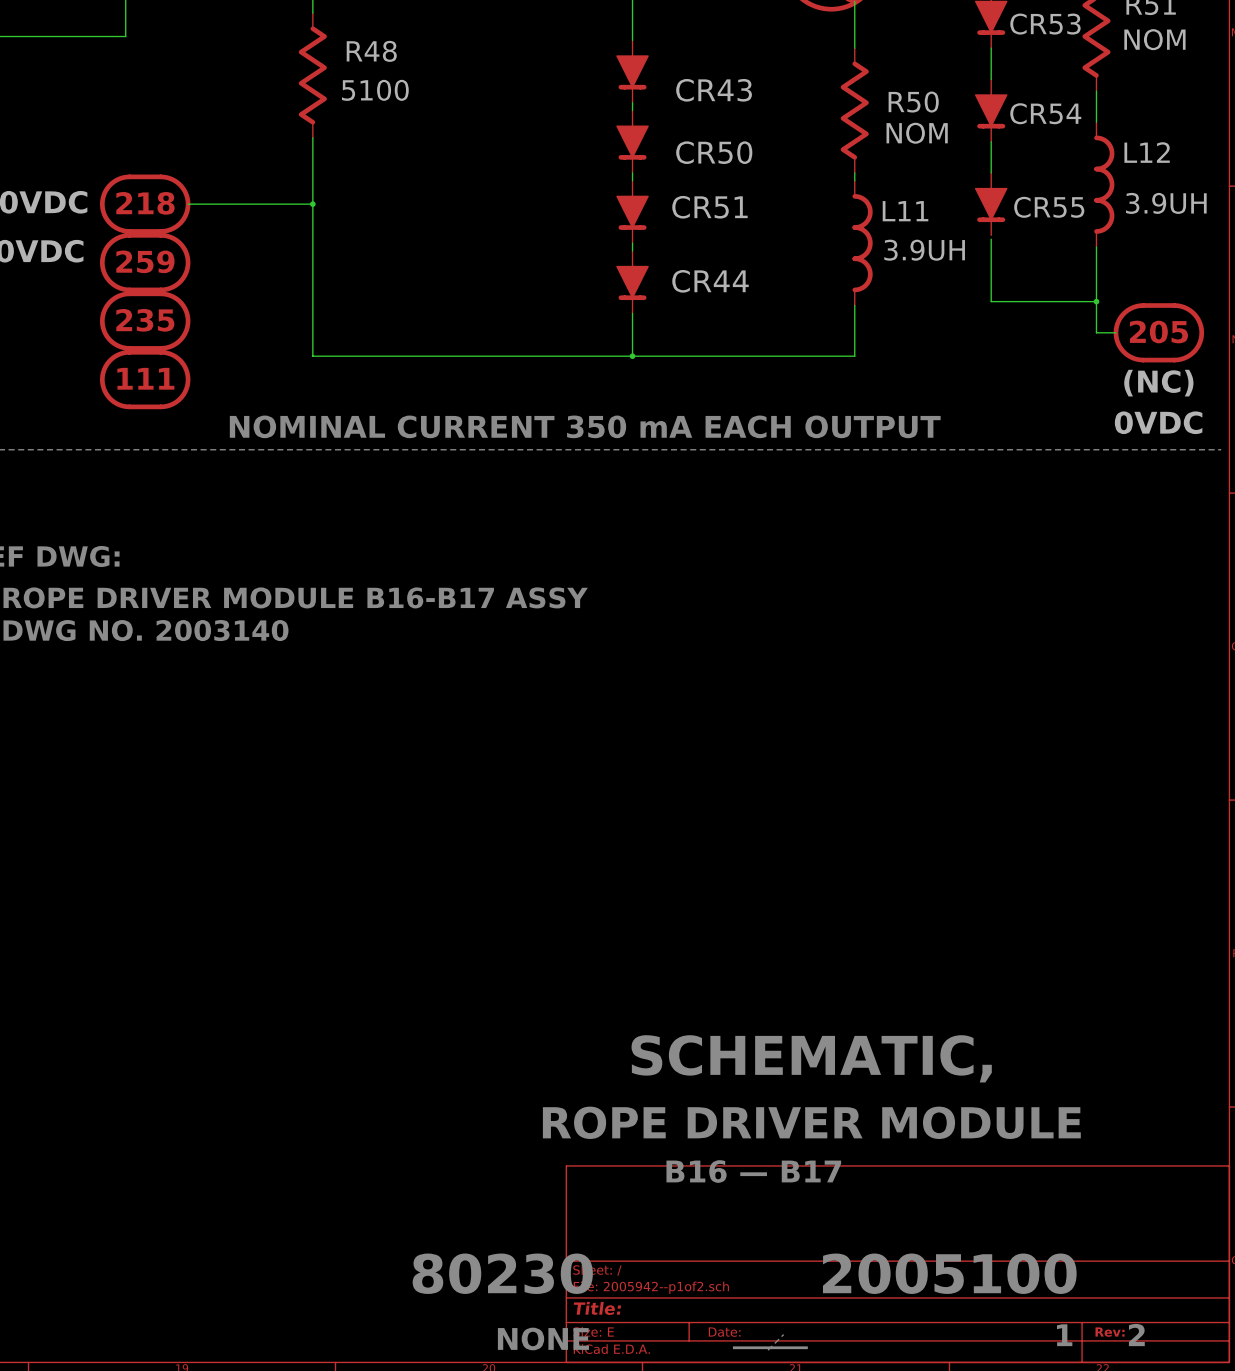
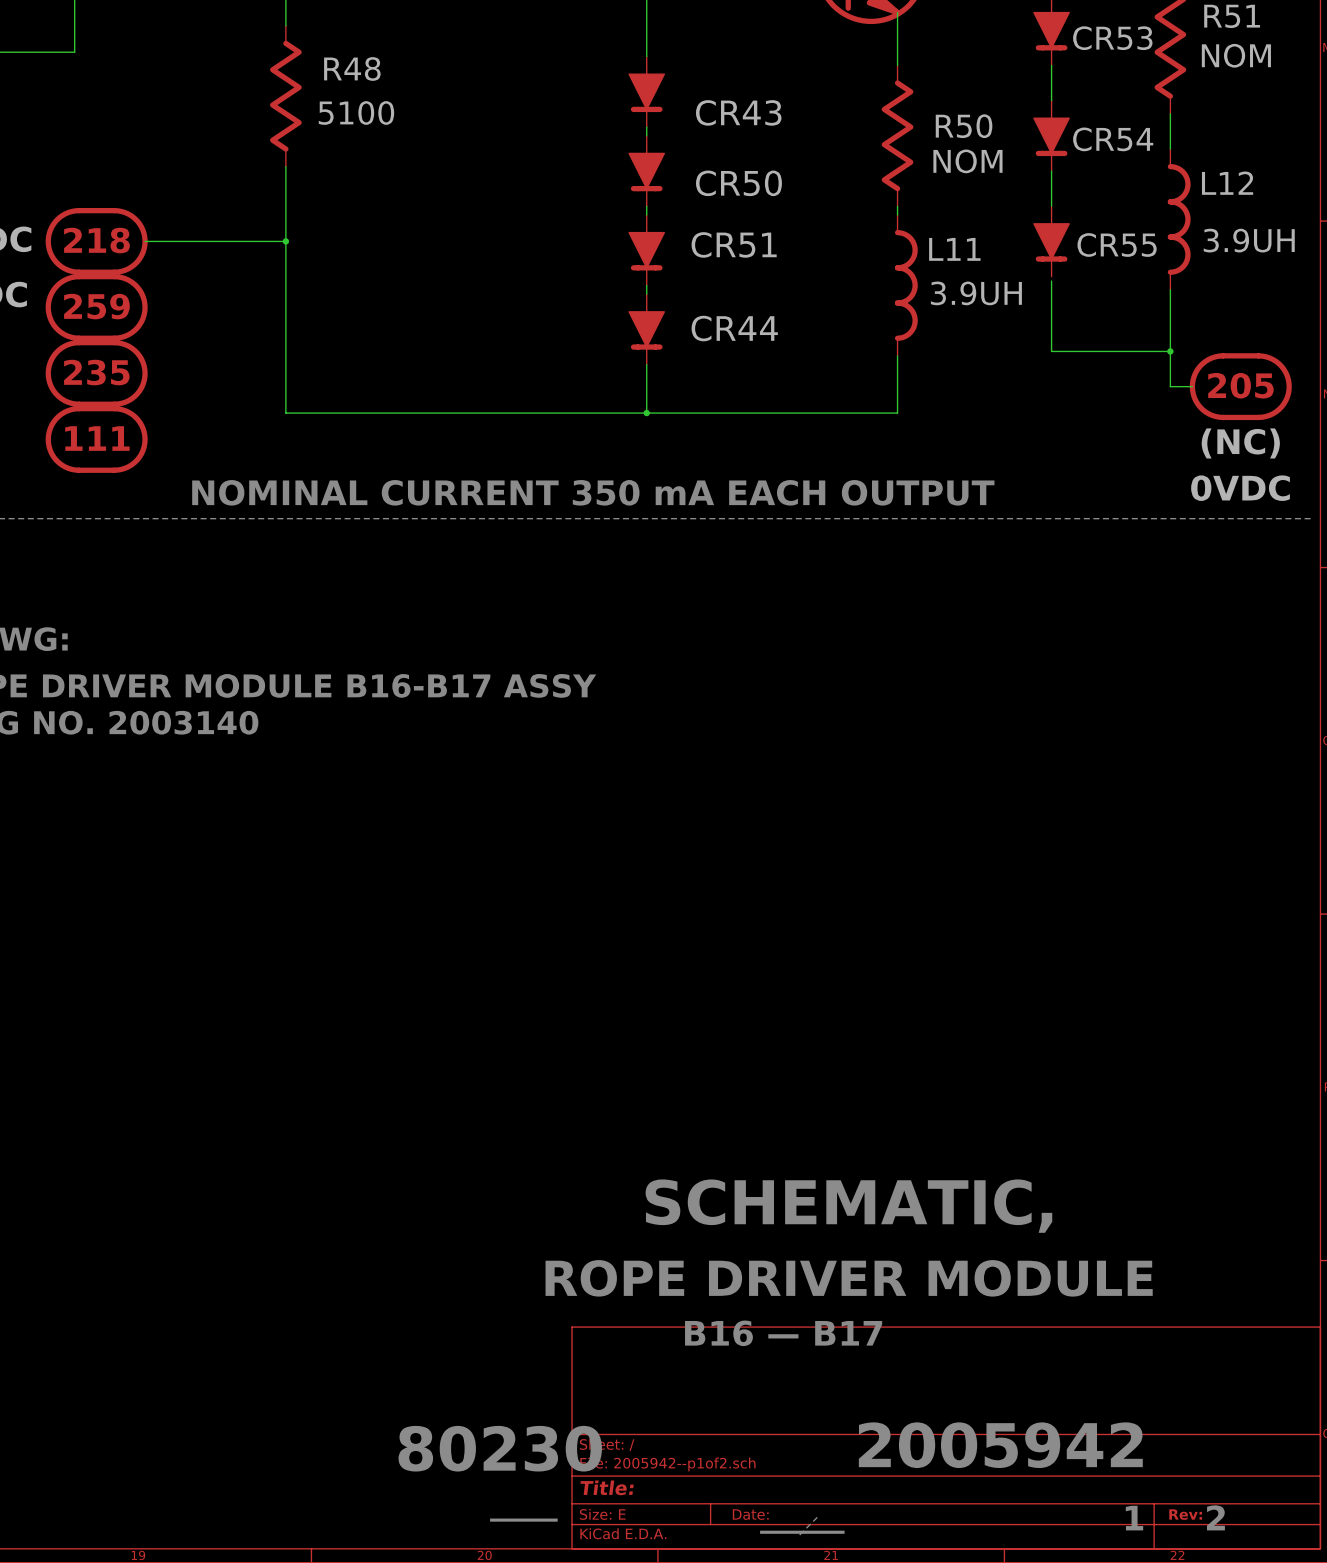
text: 2005100 (949, 1273) -> 2005942 (1000, 1445)
text: none -> ____ (523, 1520)
text: NONE (543, 1338) -> none

